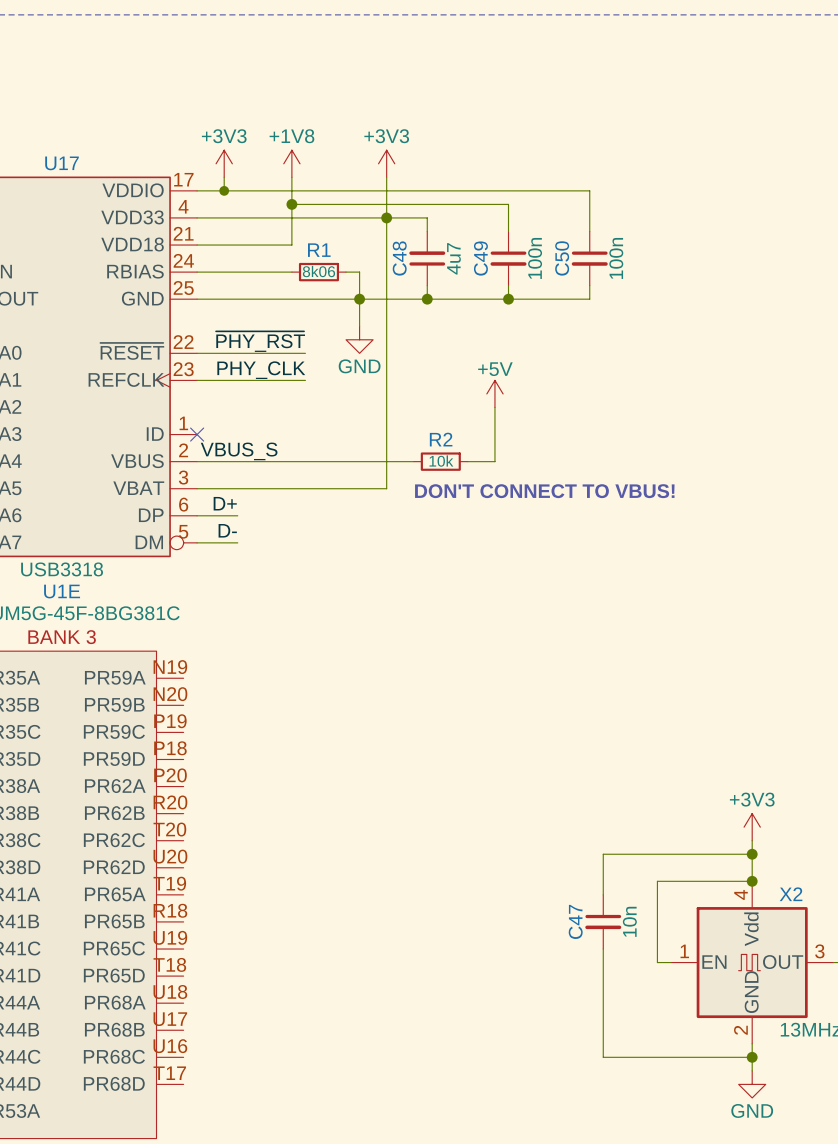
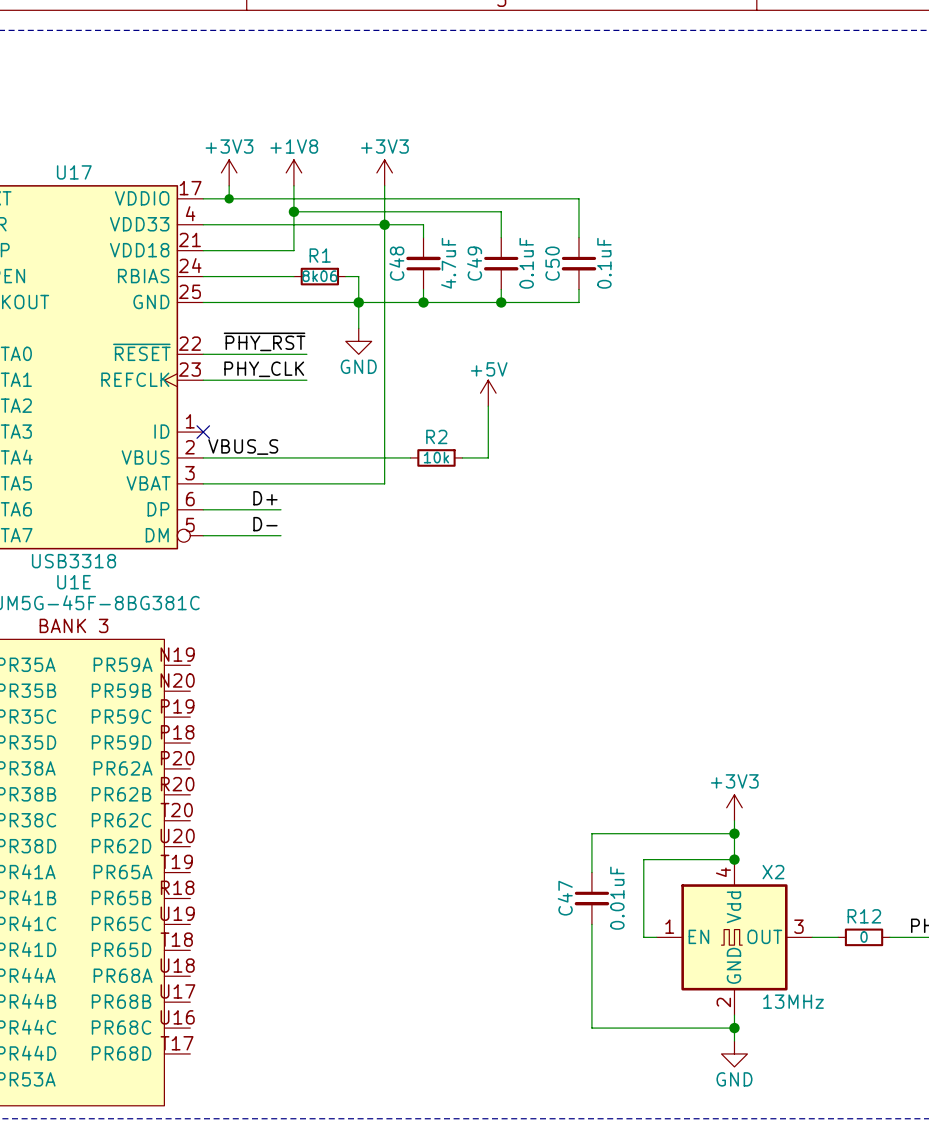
C48 value: 4u7 (453, 258) -> 4.7uF (448, 263)
C49 value: 100n (535, 258) -> 0.1uF (526, 263)
C50 value: 100n (616, 258) -> 0.1uF (604, 263)
text: DON'T CONNECT TO VBUS! (544, 491) -> none
label position: D+ (225, 503) -> D+ (265, 498)
wire: none -> (242, 509) (280, 509)
label position: D- (227, 530) -> D- (265, 524)
wire: none -> (242, 535) (280, 535)
C47 value: 10n (629, 921) -> 0.01uF (617, 898)

